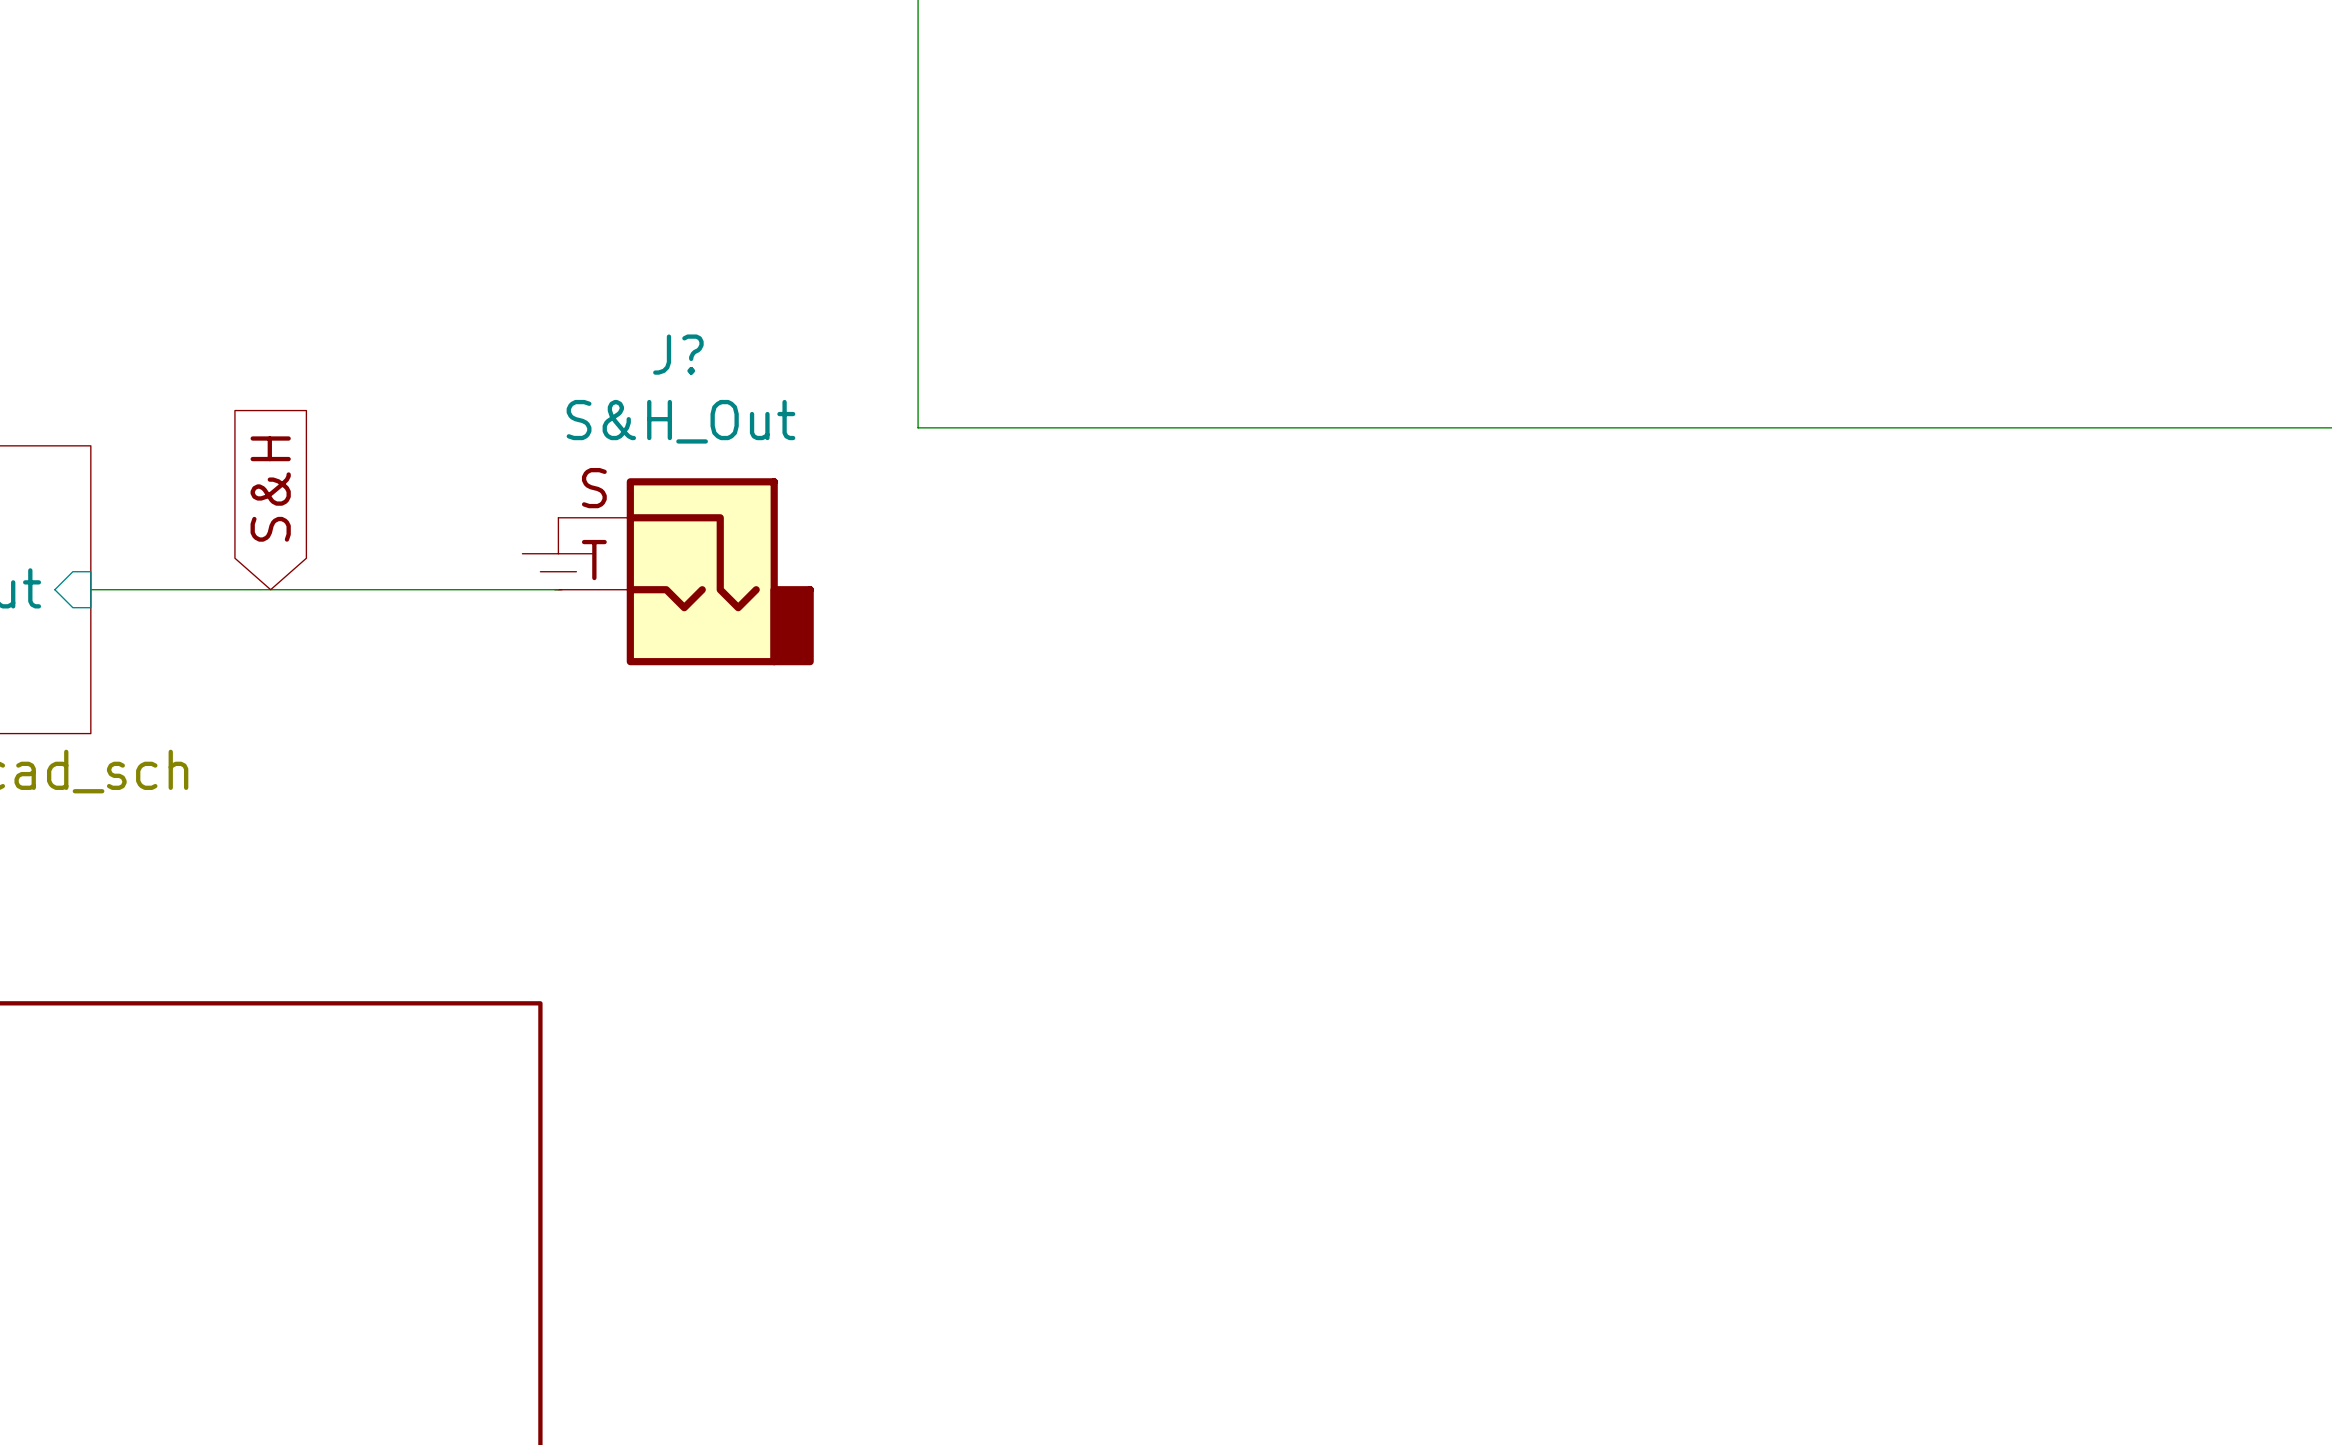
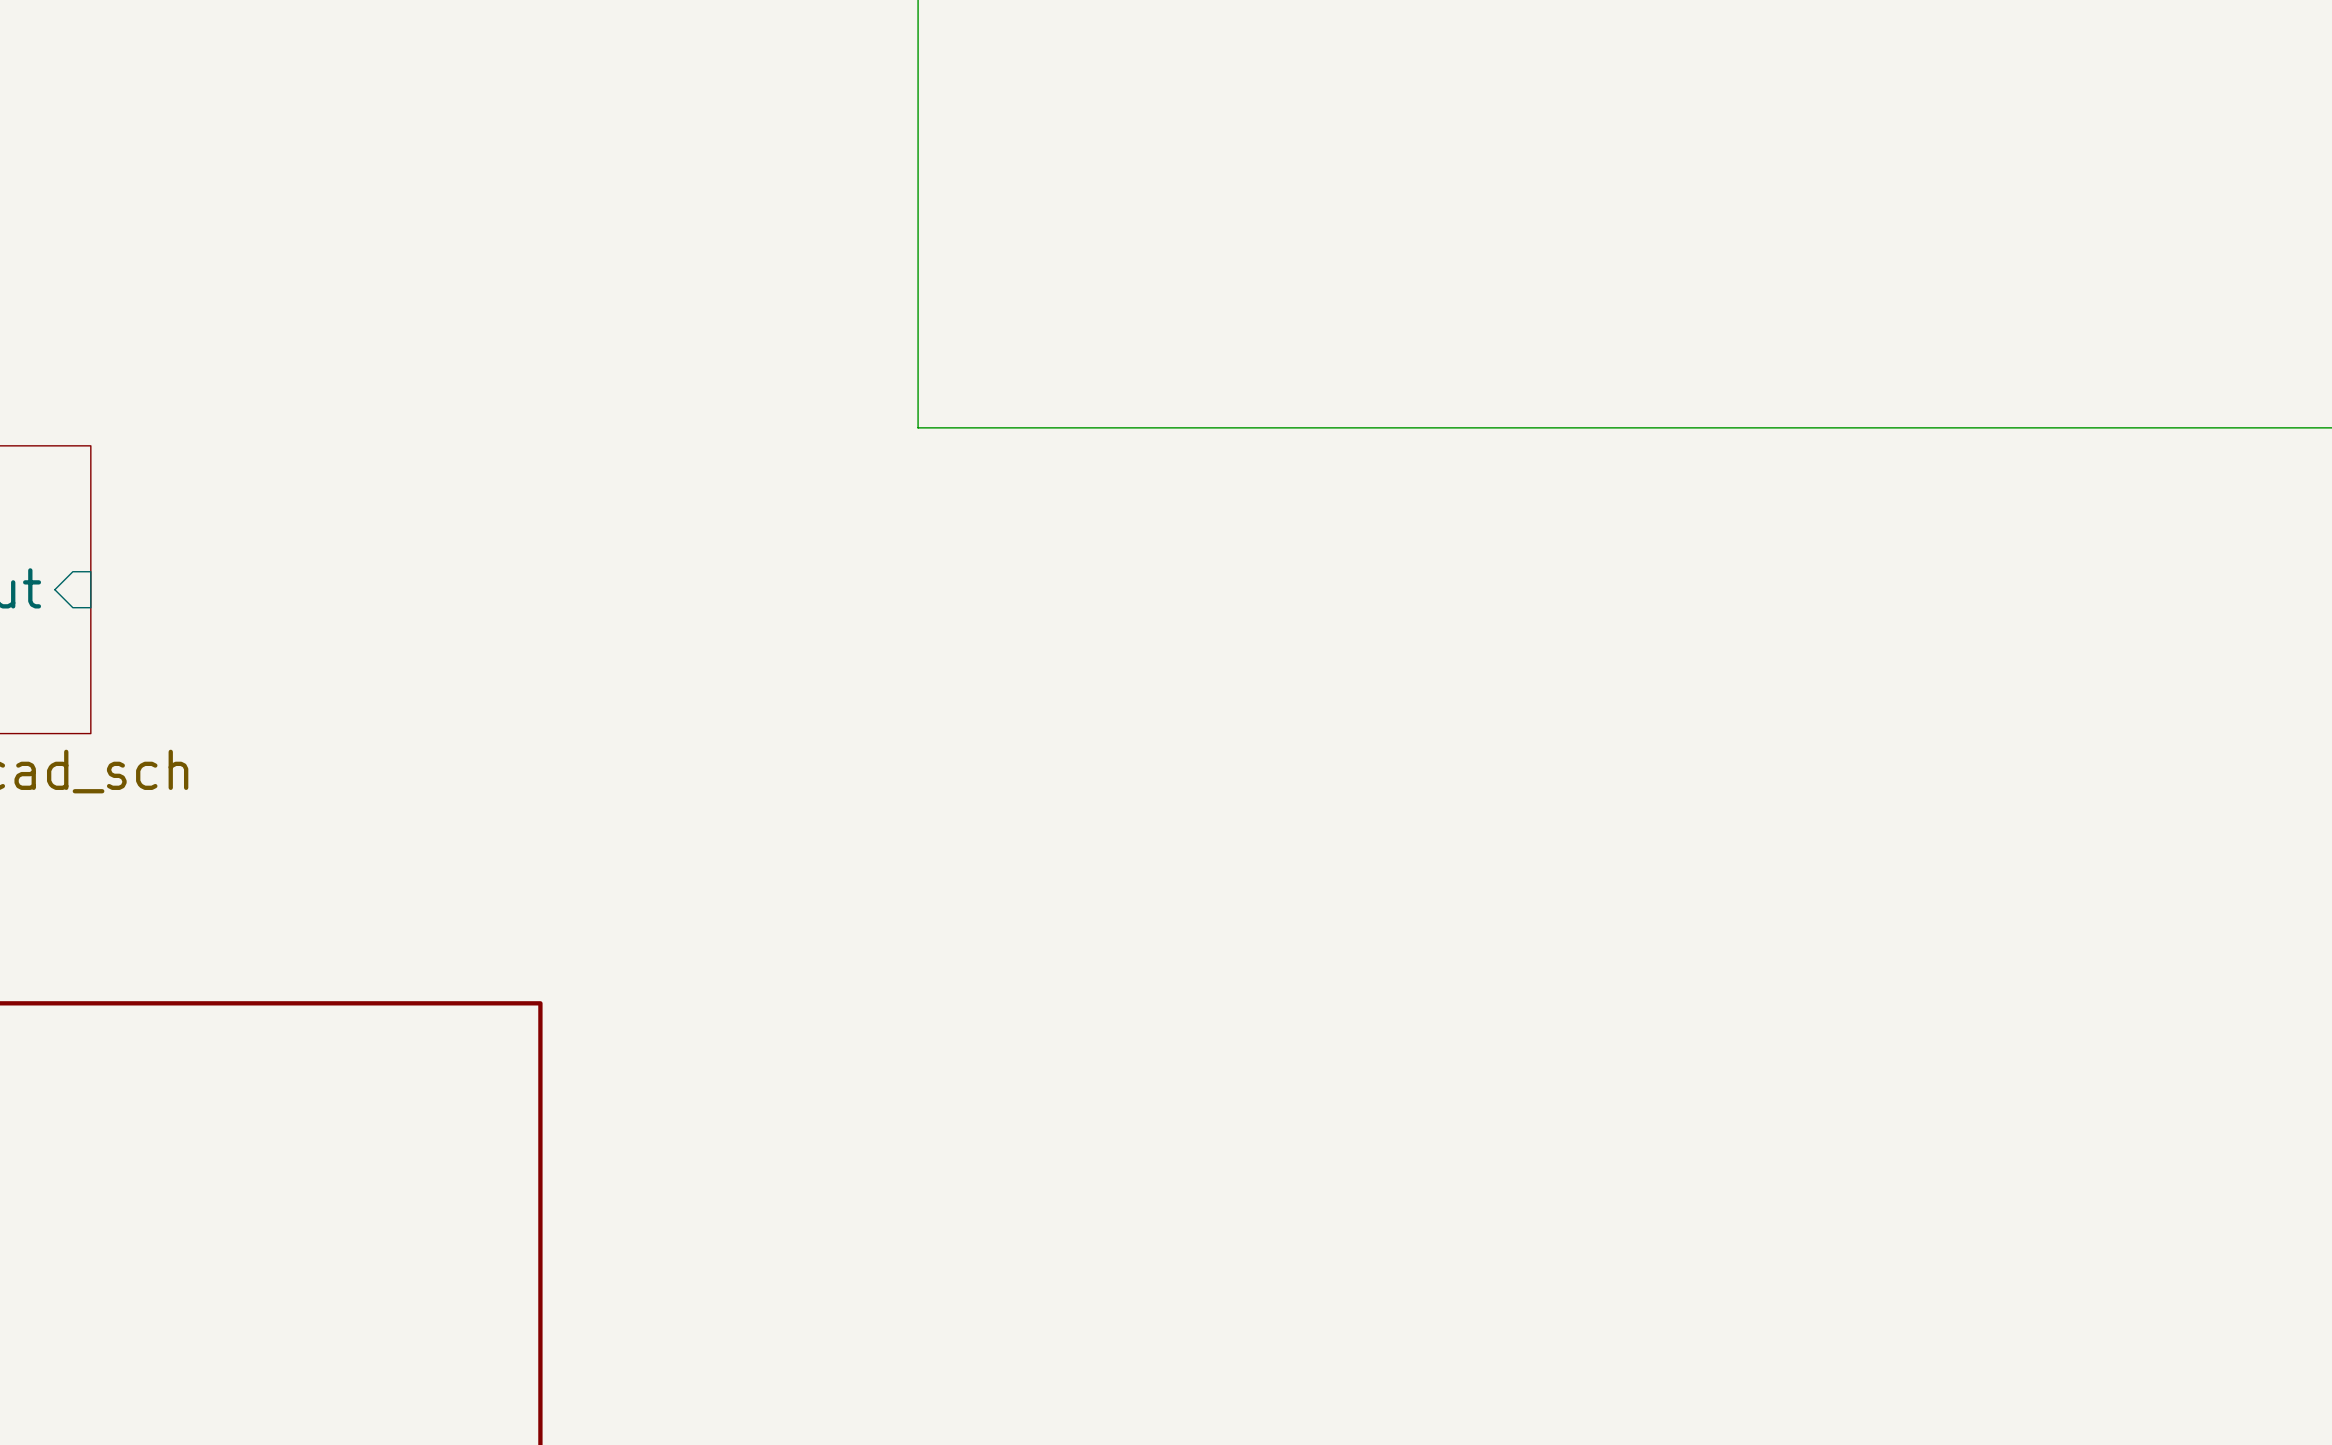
global label: S&H (270, 489) -> none
power symbol: (558, 553) -> none
J?: S&H_Out (686, 571) -> none
wire: (90, 589) (558, 589) -> none

